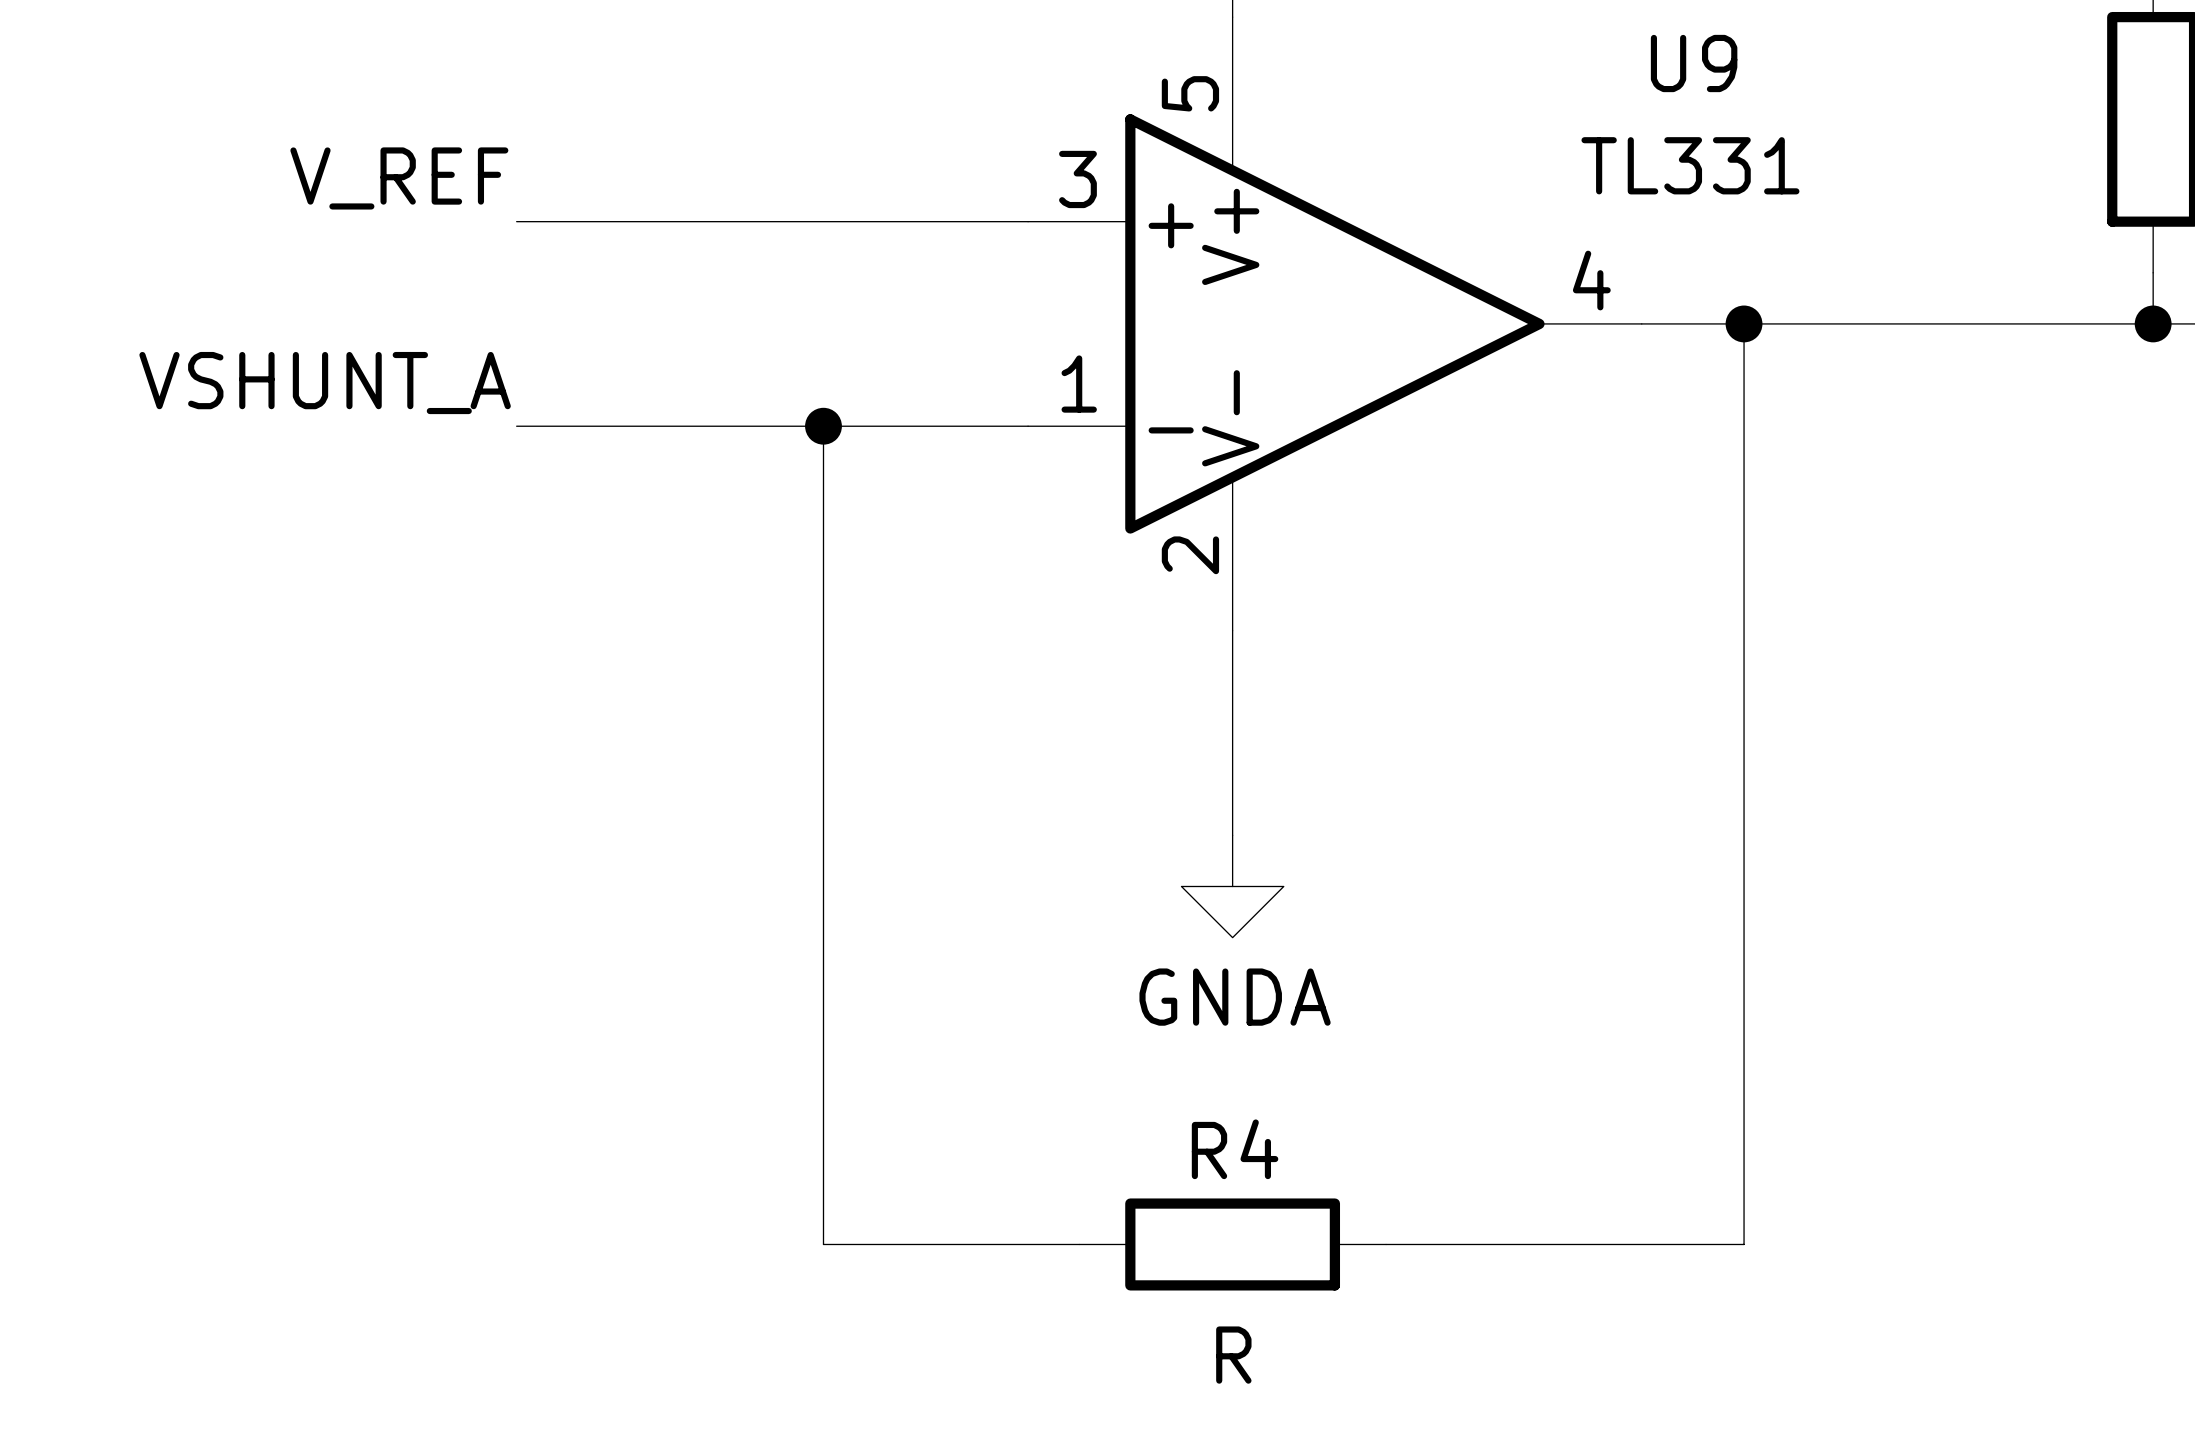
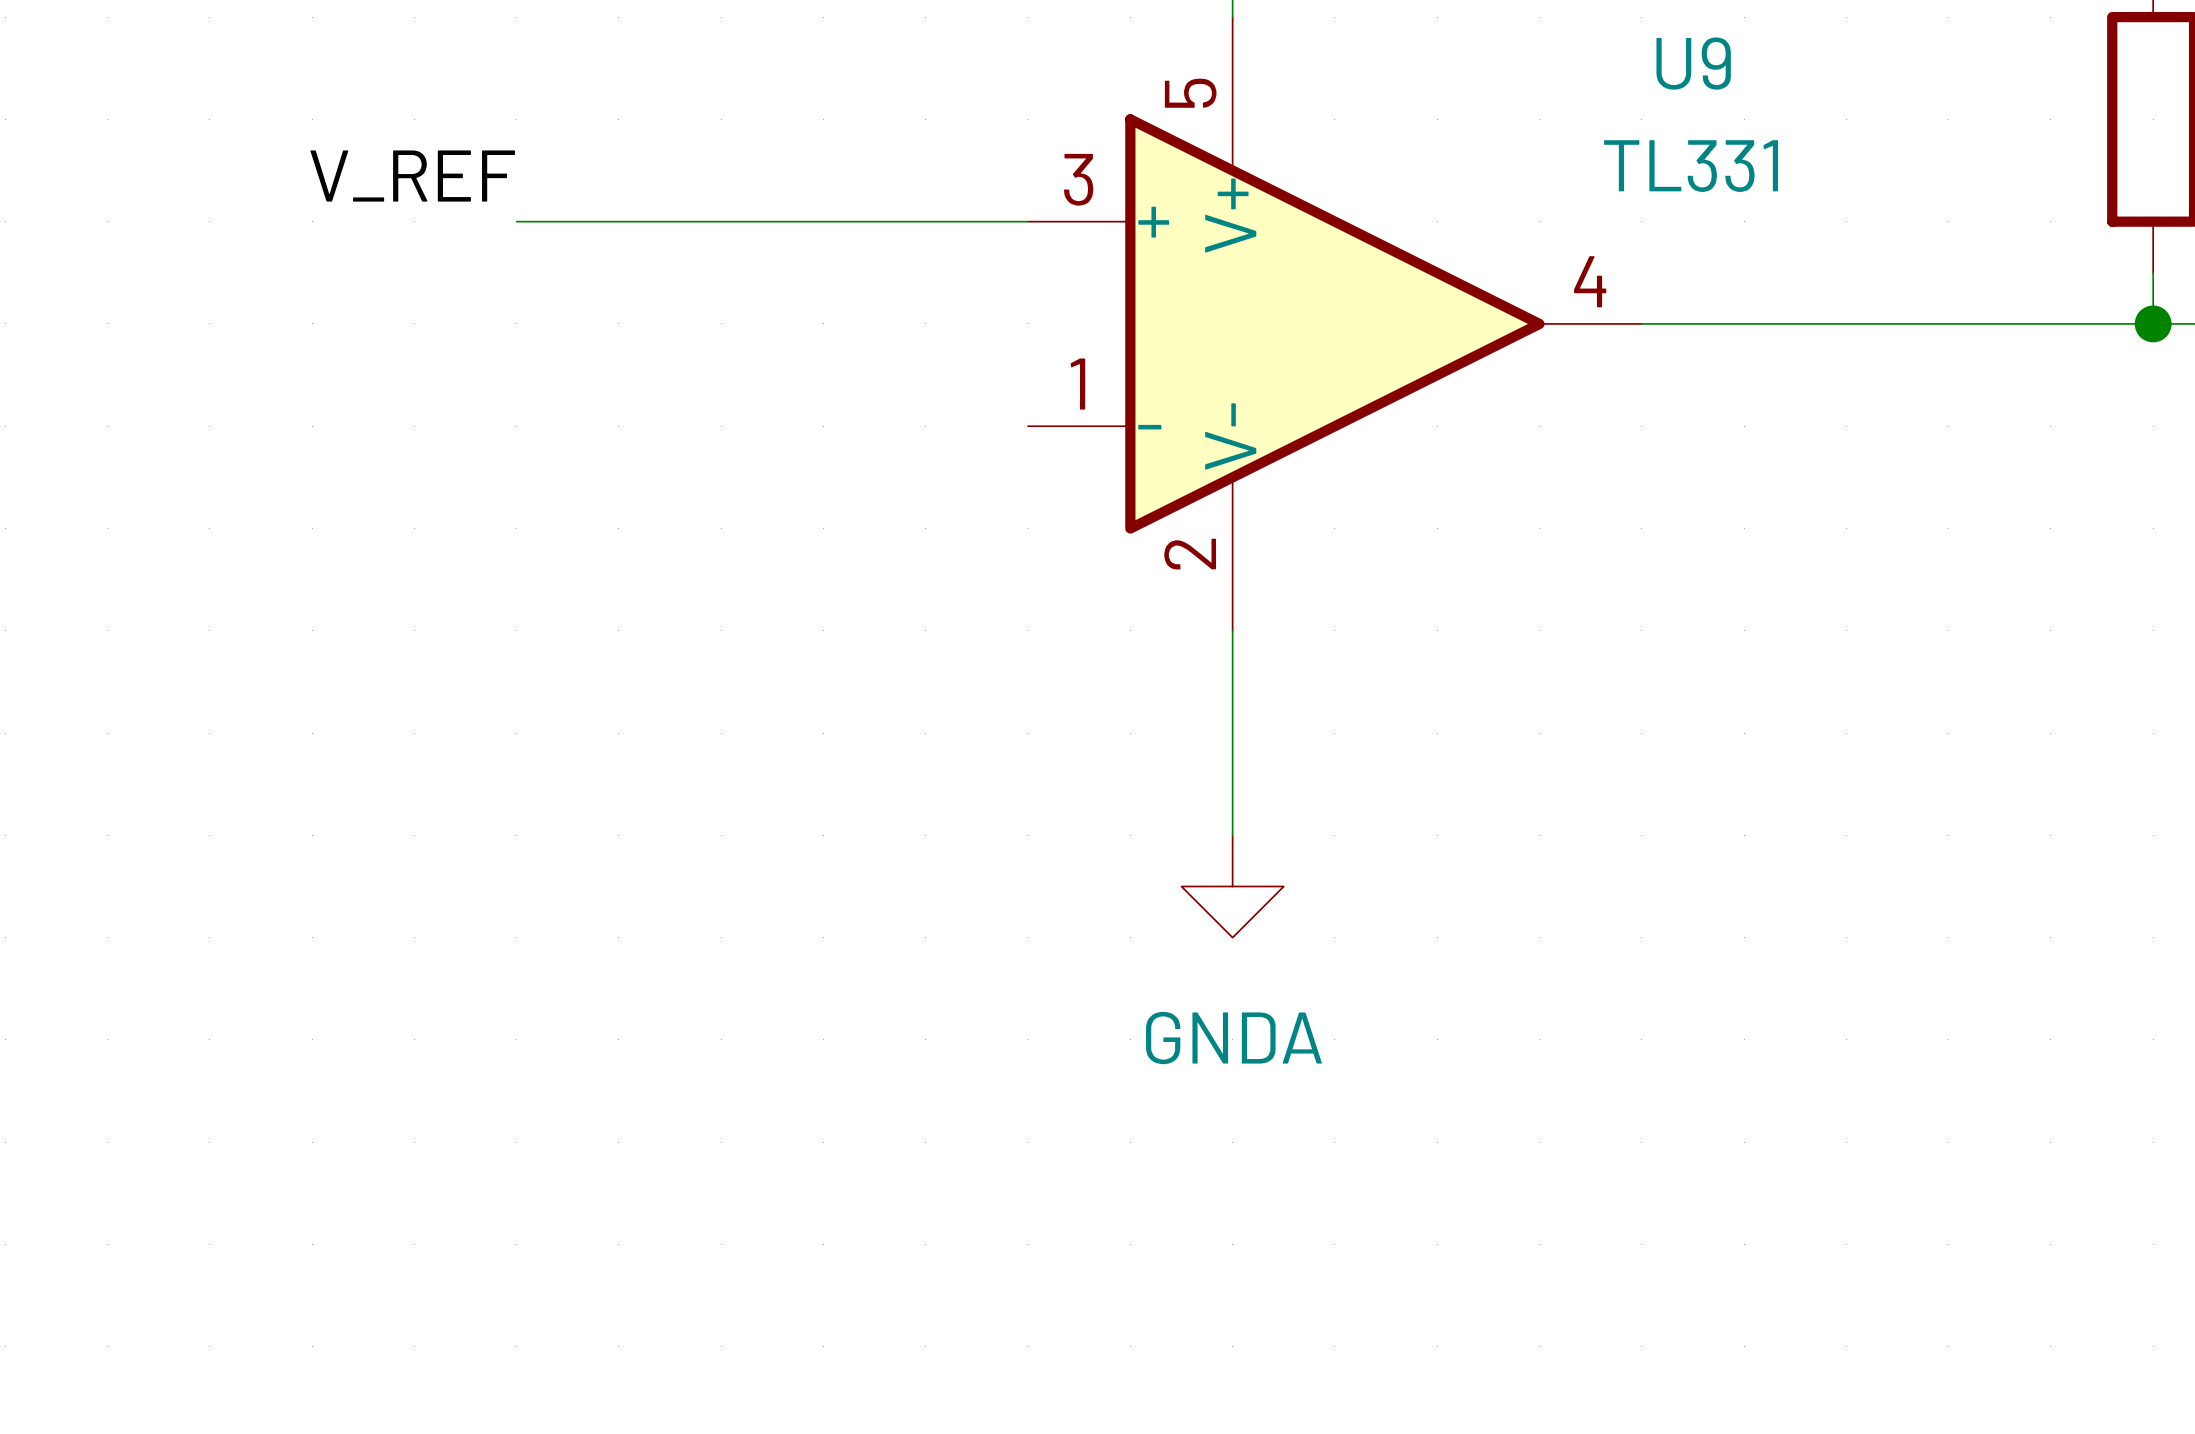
wire: (1744, 323) (1744, 1244) (1386, 1244) -> none
junction: (1744, 323) -> none
label: VSHUNT_A (325, 383) -> none
wire: (516, 426) (1028, 426) -> none
wire: (823, 426) (823, 1244) (1079, 1244) -> none
junction: (823, 426) -> none
power symbol text position: GNDA (1235, 997) -> GNDA (1233, 1038)
R4: R (1232, 1244) -> none

